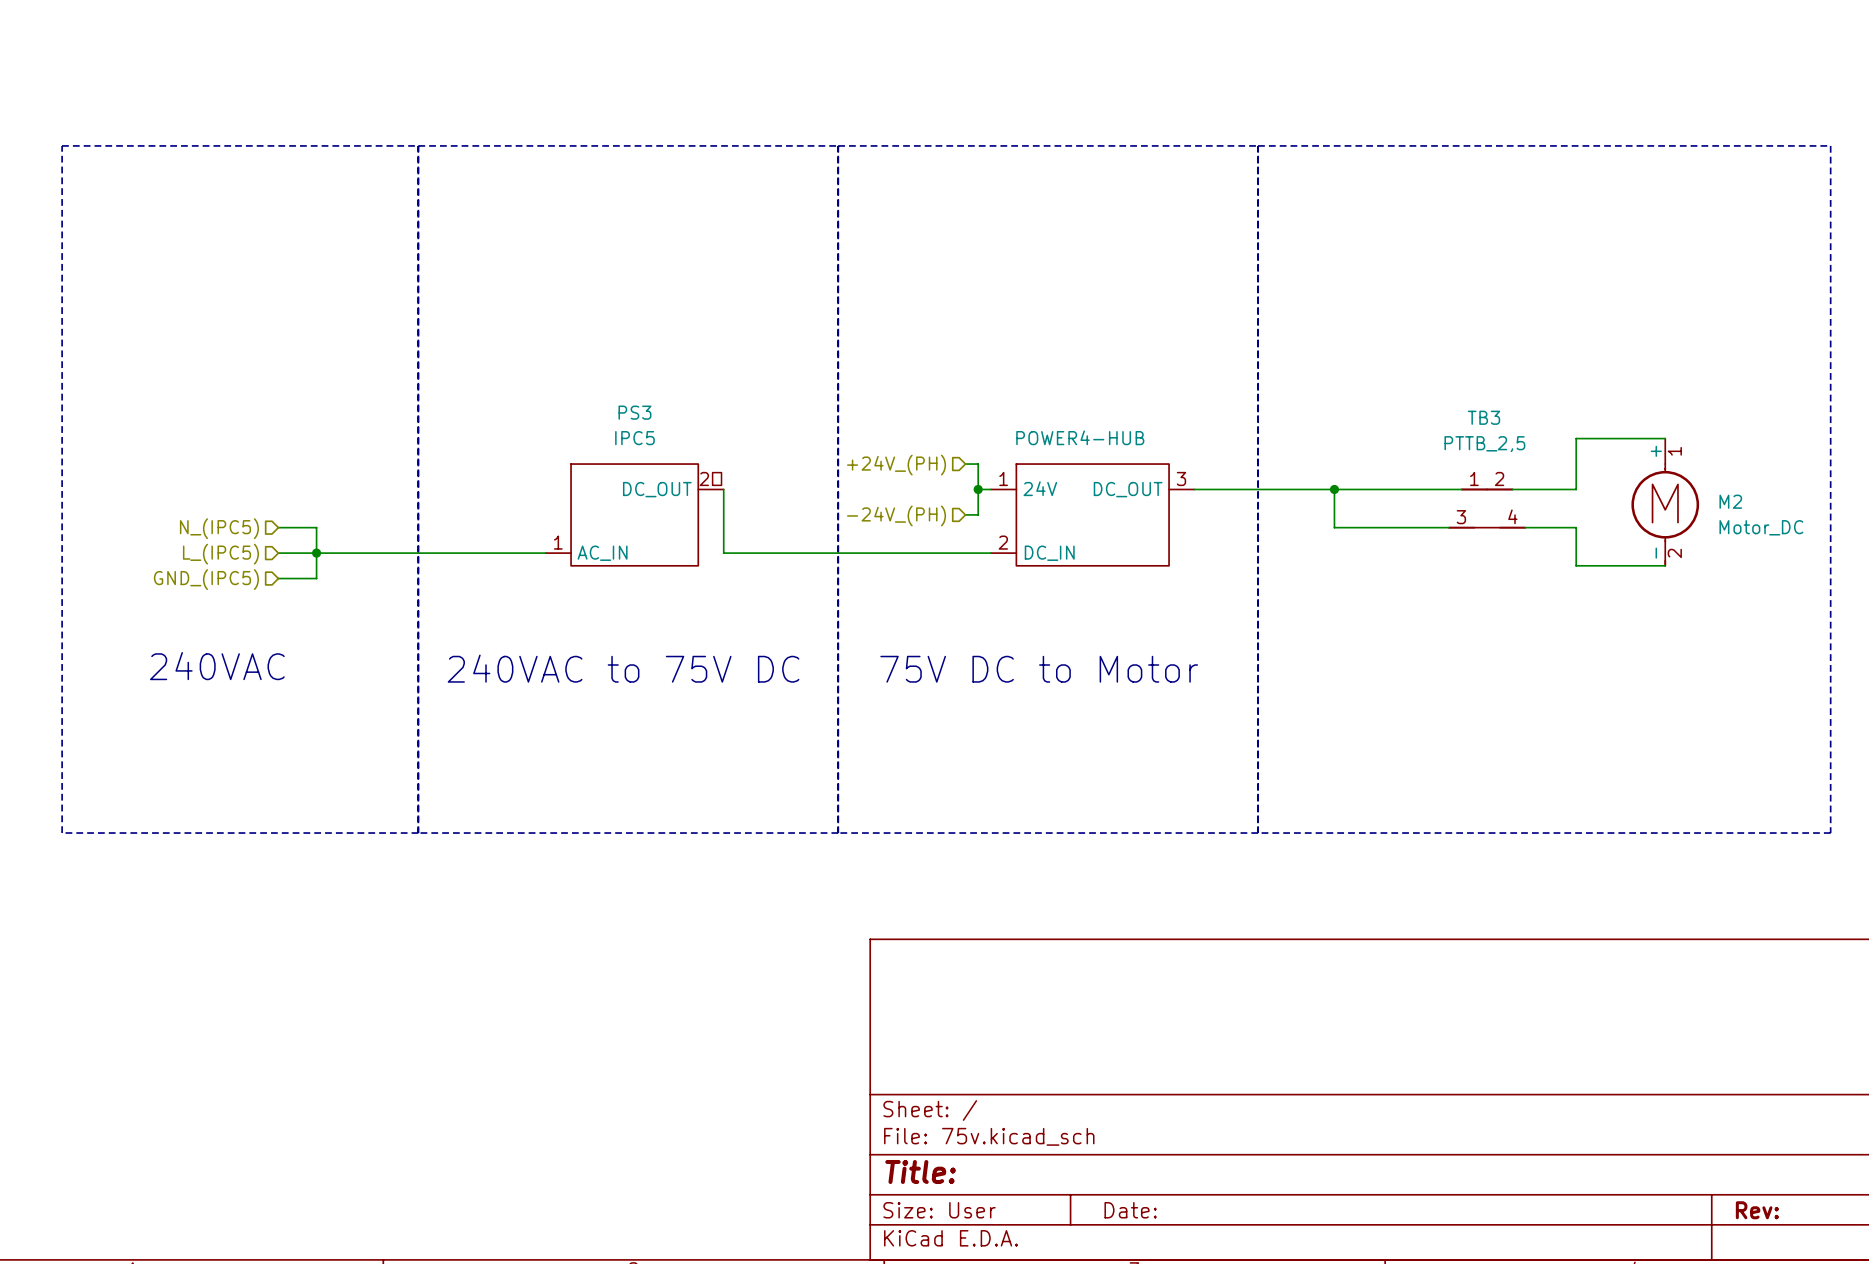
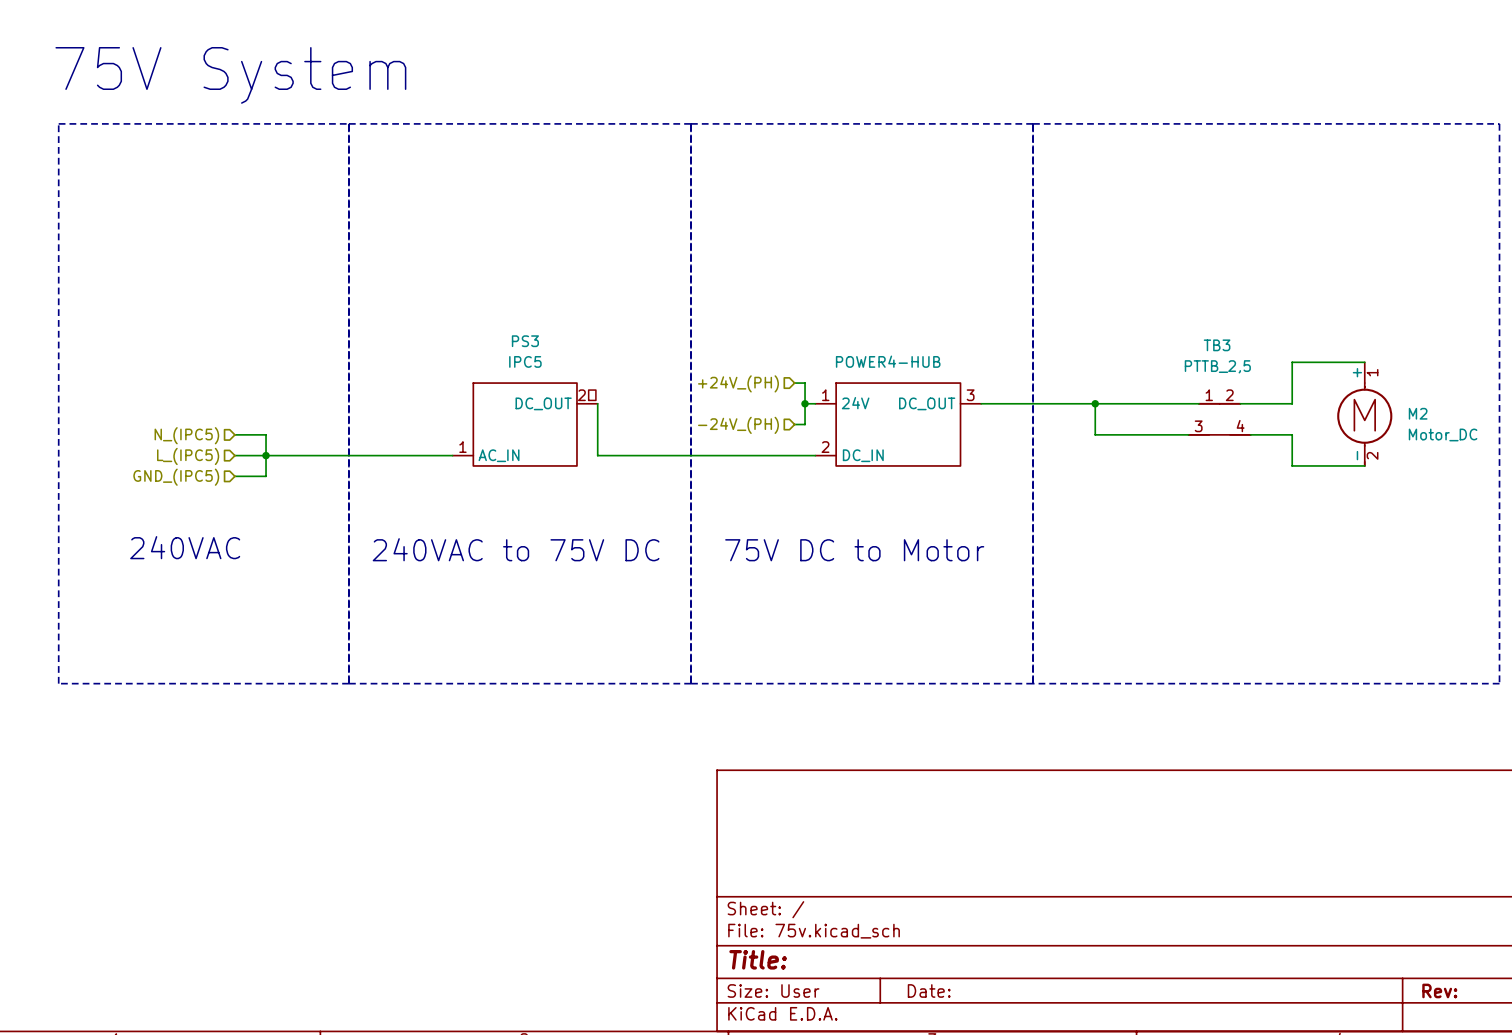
text: none -> 75V System (230, 75)

